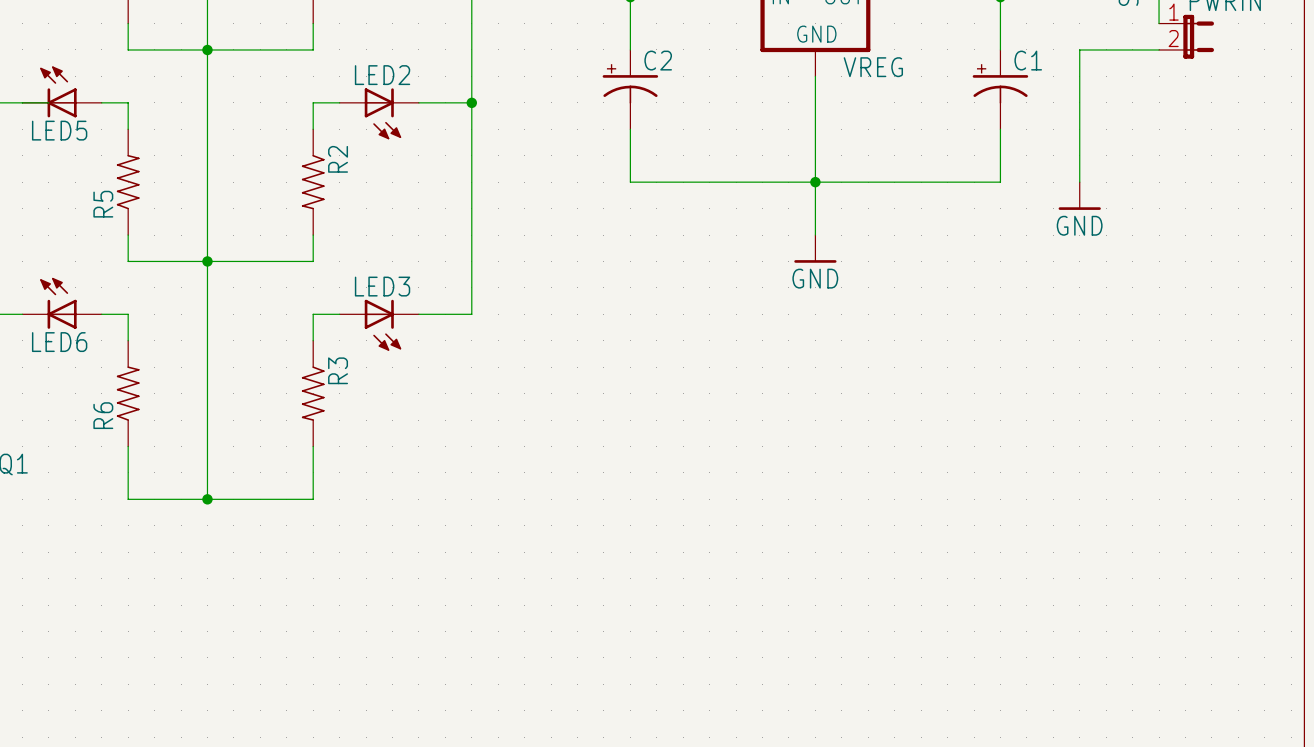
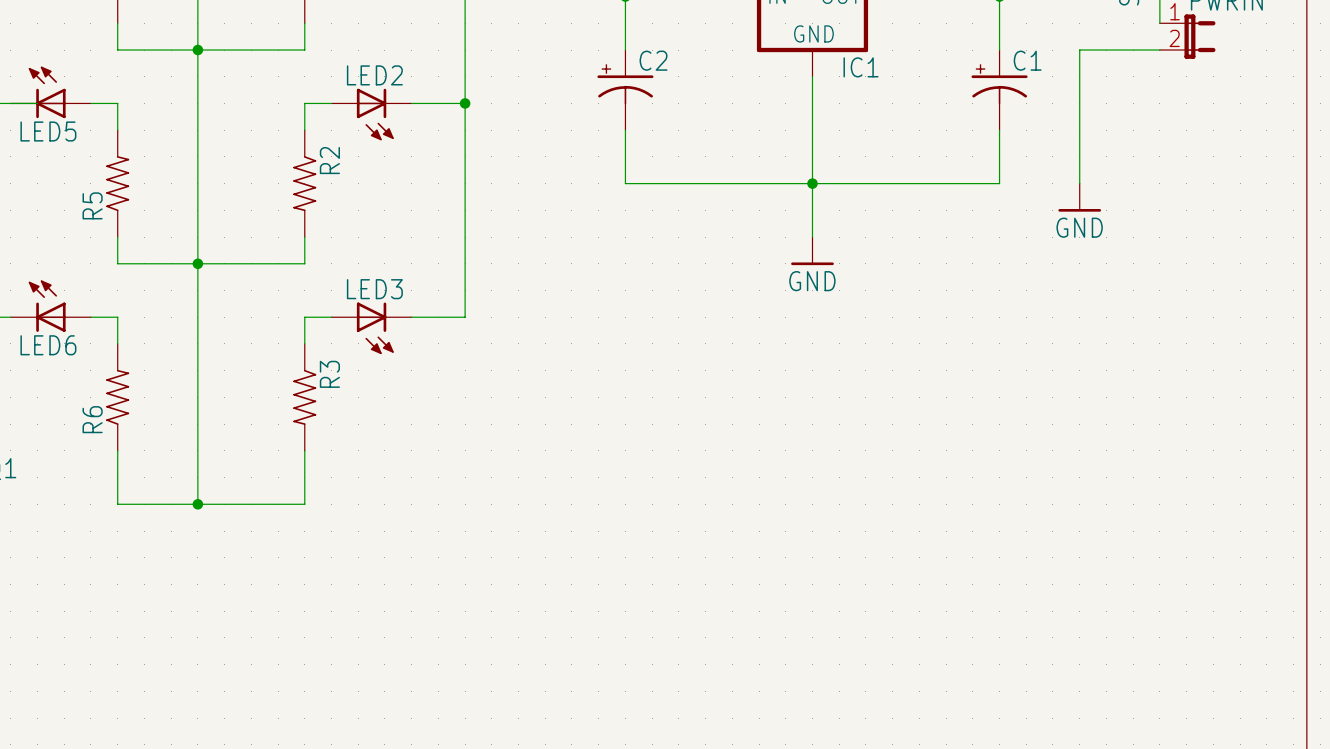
VREG name: VREG (873, 67) -> IC1 (861, 67)

